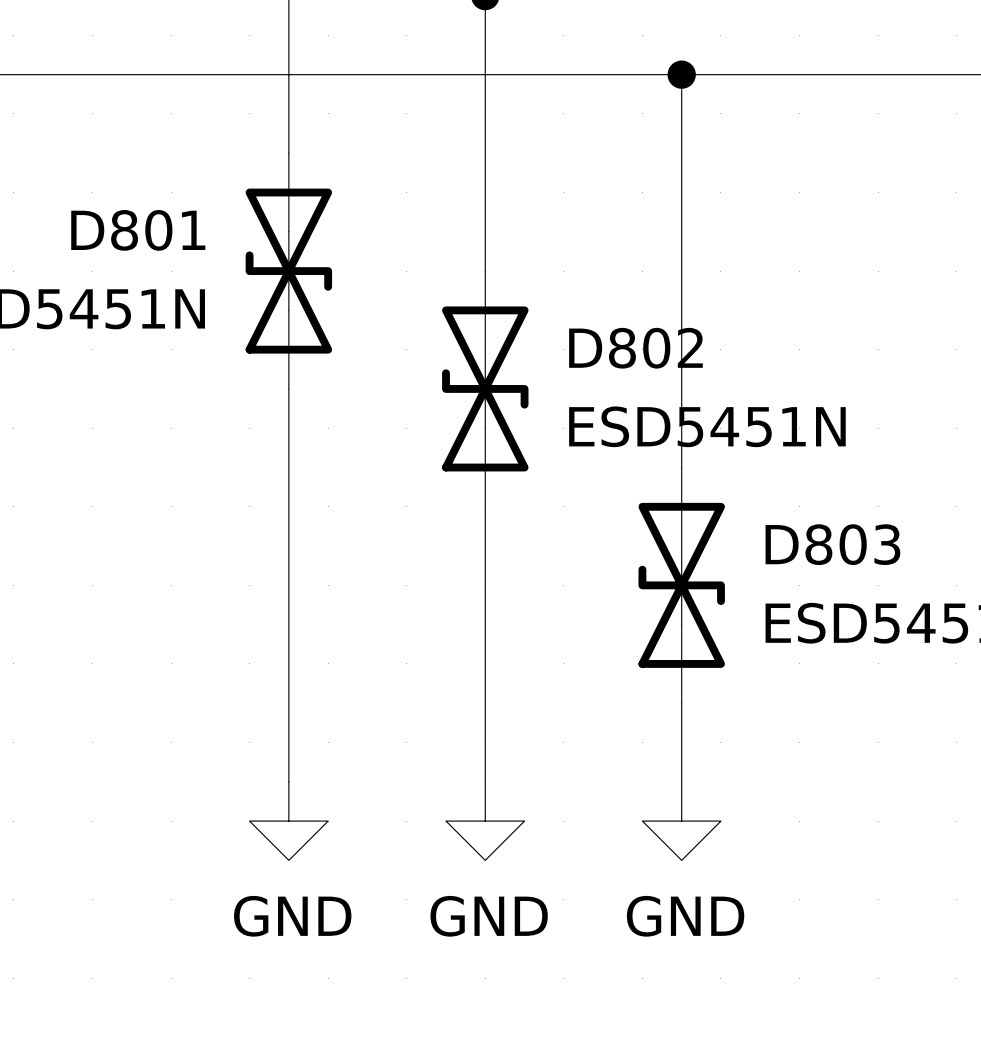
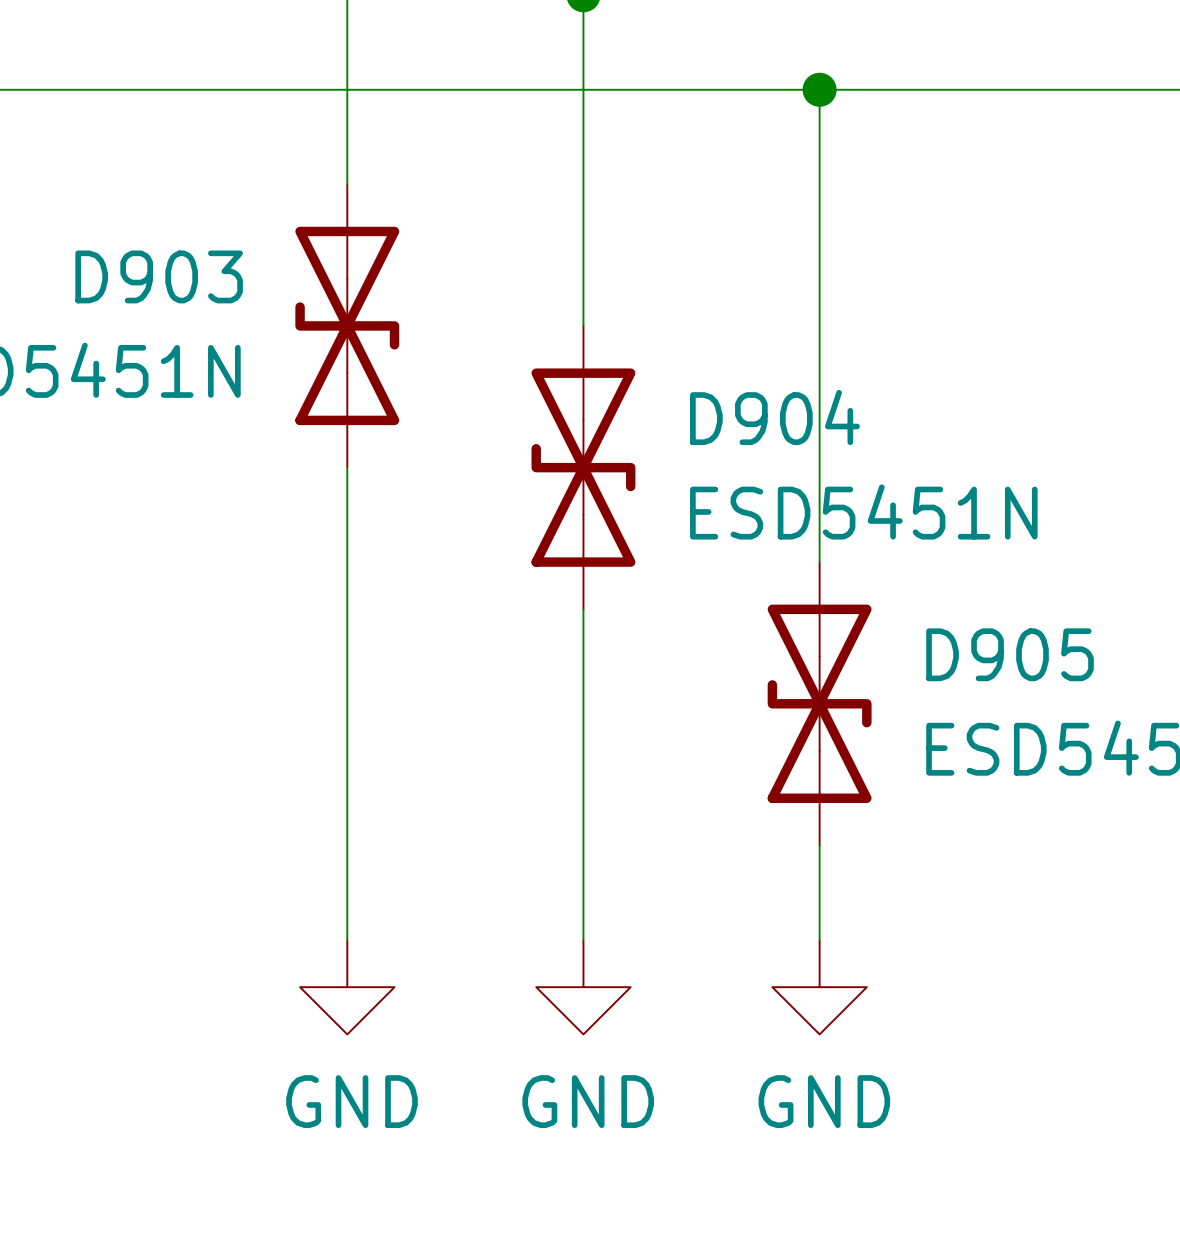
D801 name: D801 (138, 230) -> D903 (159, 276)
D802 name: D802 (635, 348) -> D904 (774, 417)
D803 name: D803 (832, 544) -> D905 (1010, 654)

